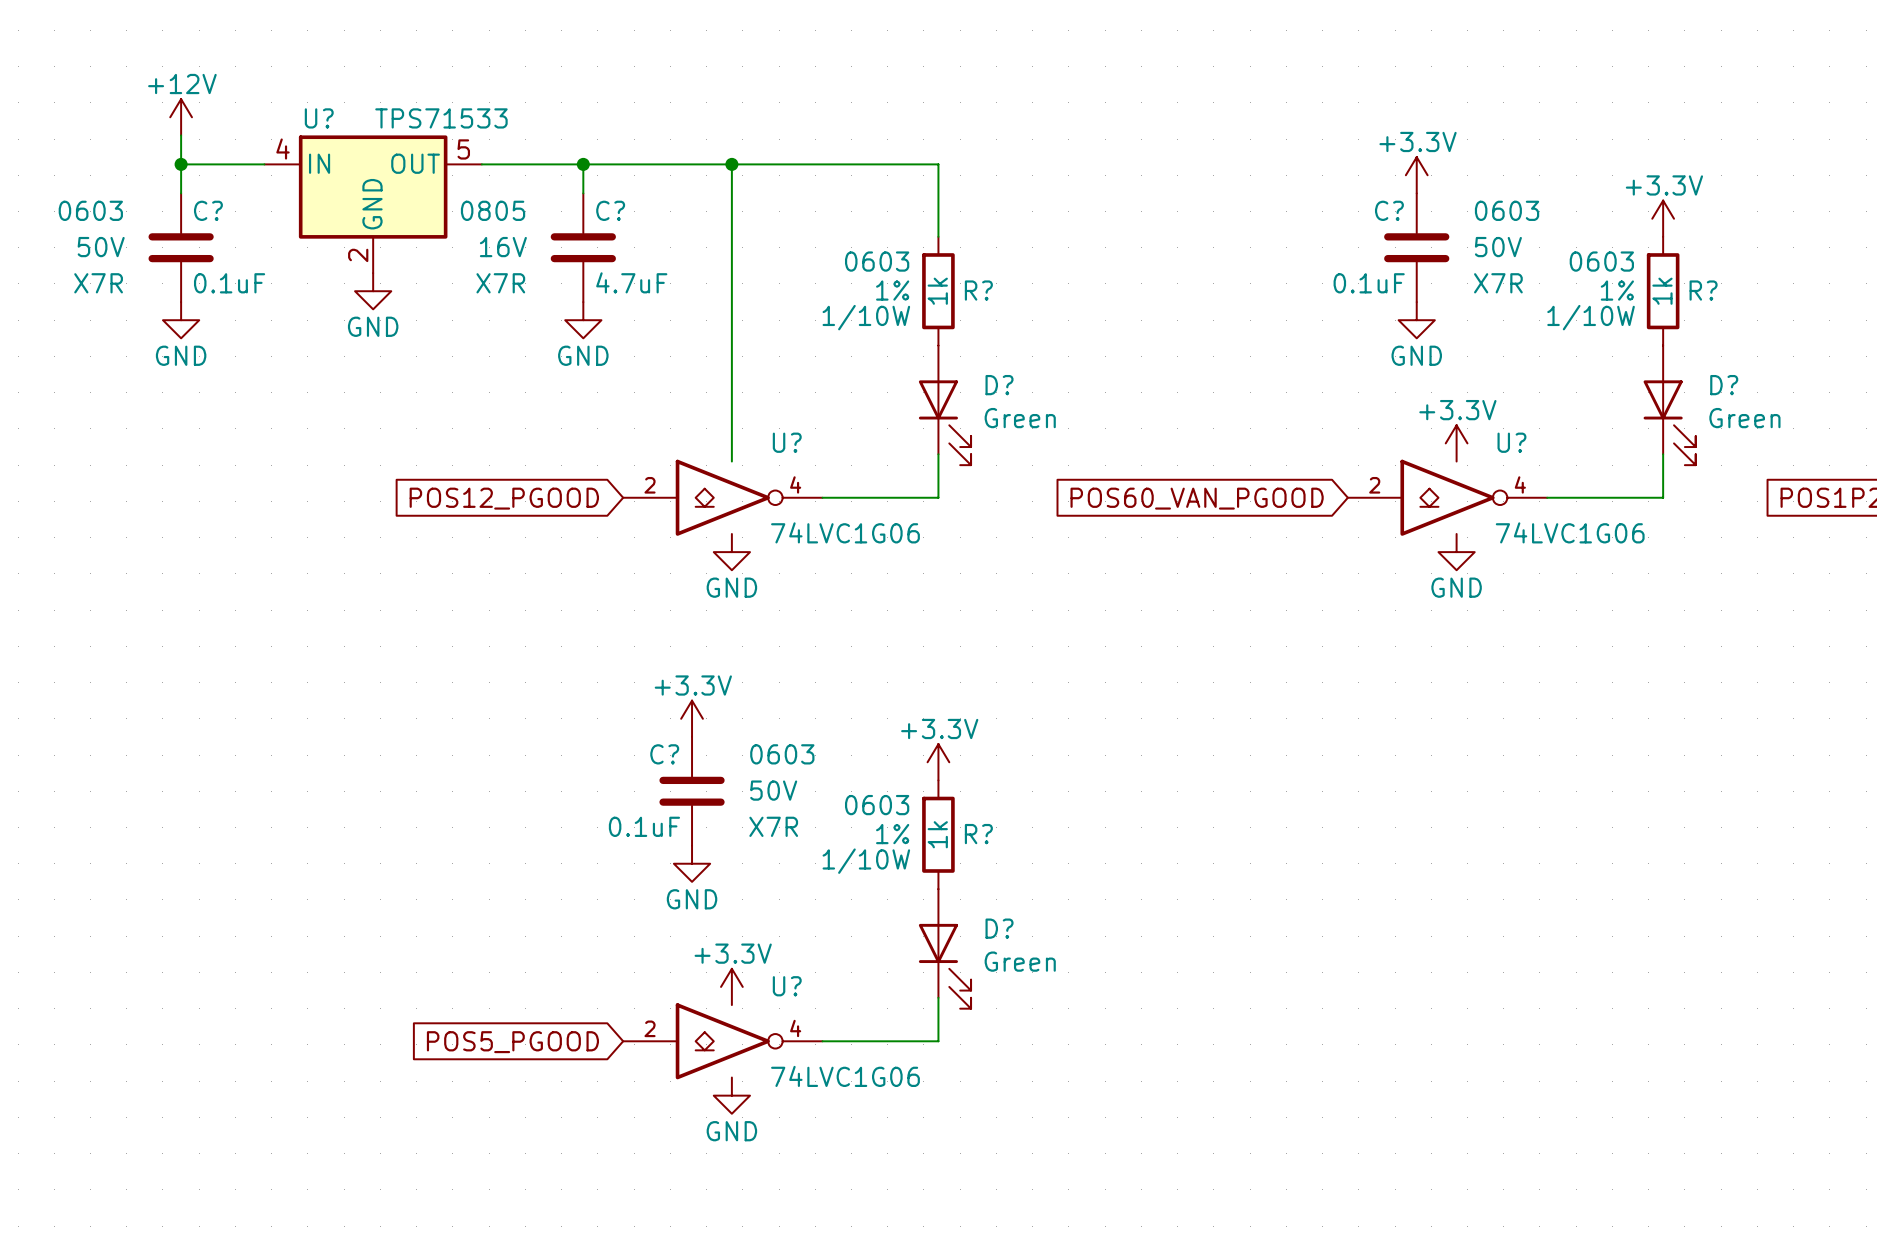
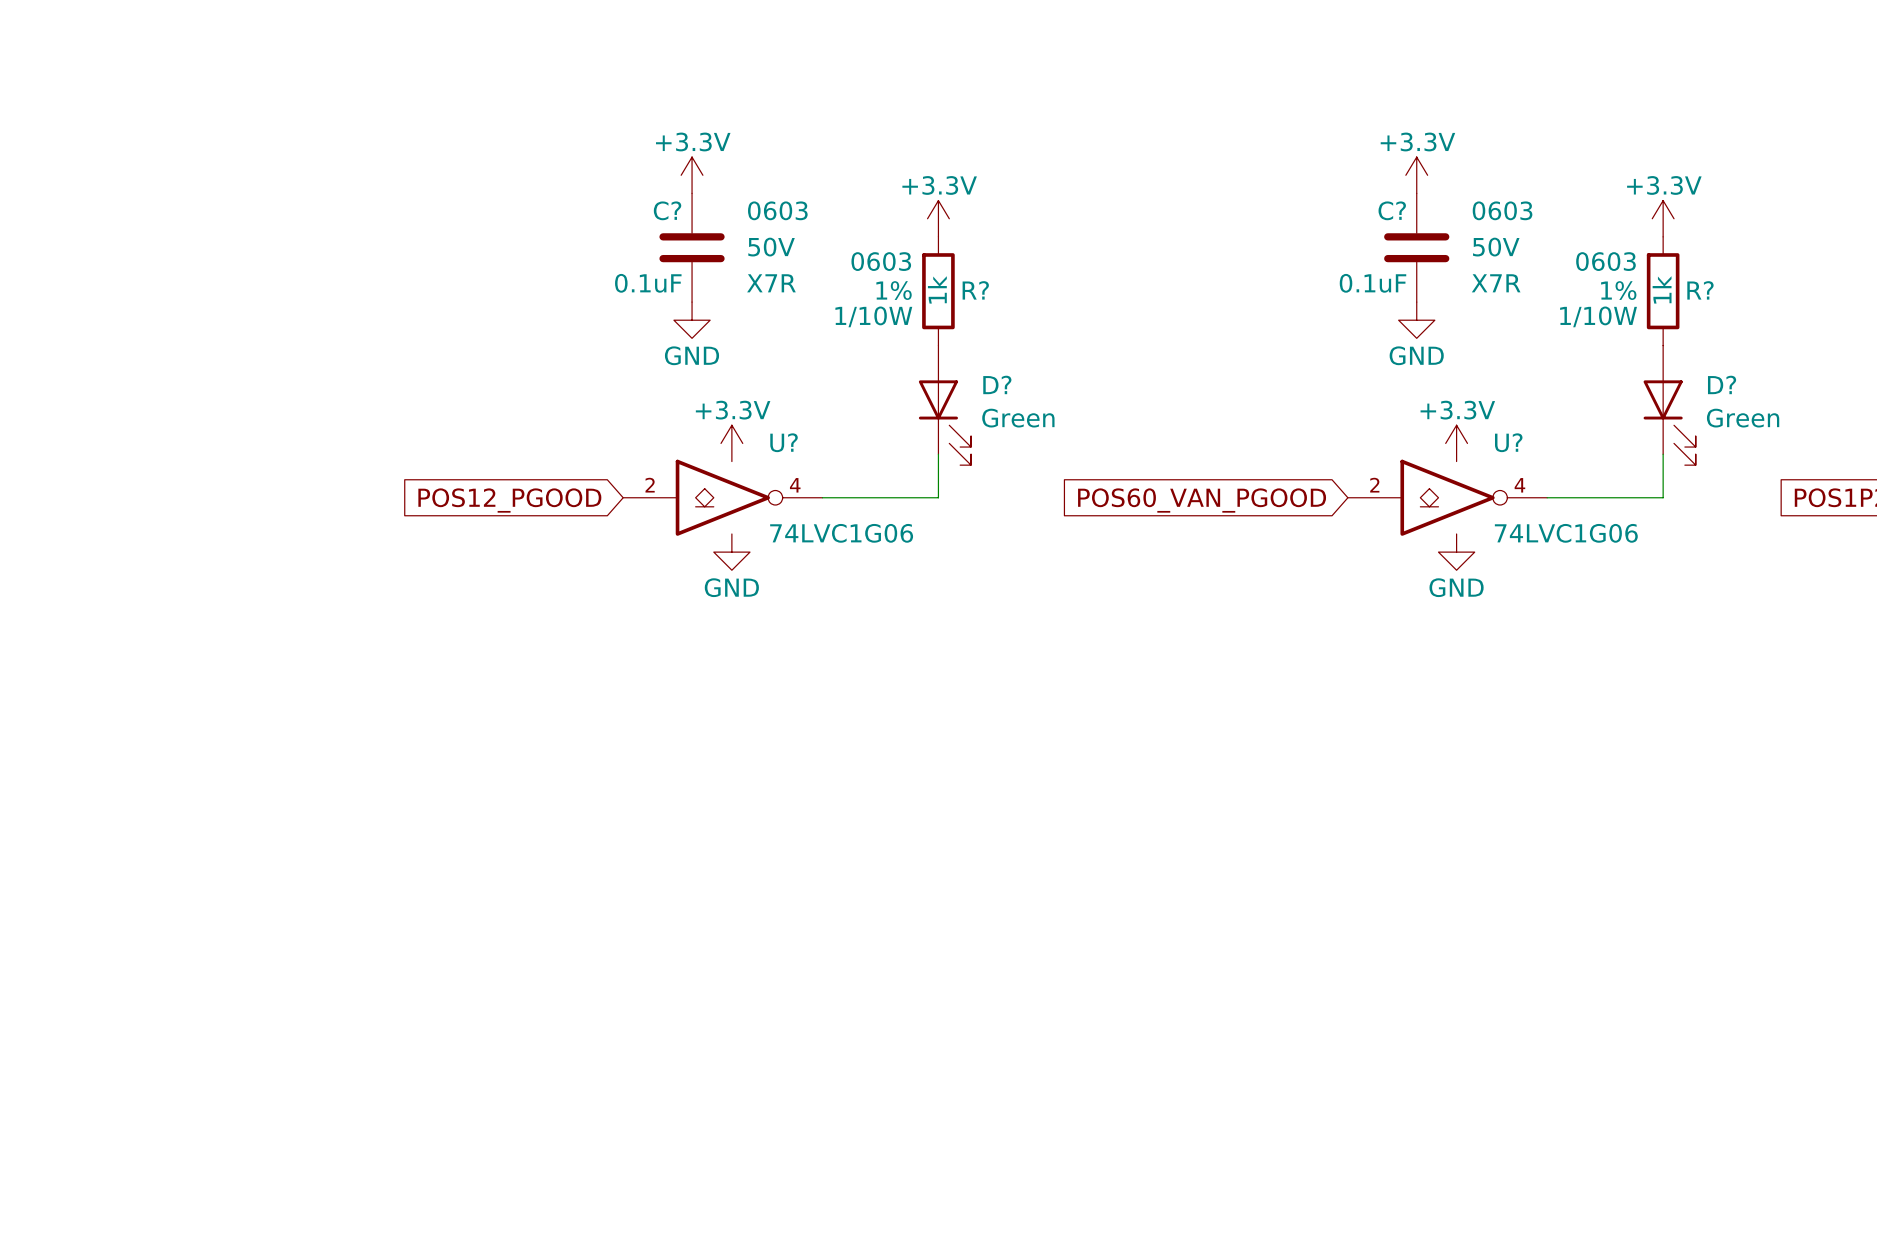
power symbol: +12V (181, 117) -> none
wire: (181, 135) (181, 193) -> none
wire: (181, 164) (264, 164) -> none
junction: (181, 164) -> none
wire: (481, 164) (938, 164) (938, 236) -> none
wire: (583, 164) (583, 193) -> none
junction: (583, 164) -> none
wire: (731, 164) (731, 461) -> none
junction: (731, 164) -> none
power symbol: none -> +3.3V (692, 175)
U?: TPS71533 (373, 204) -> none
power symbol: none -> +3.3V (938, 218)
C?: 0.1uF (181, 247) -> none
C?: 4.7uF (583, 247) -> none
C?: none -> 0.1uF (692, 247)
power symbol: GND (373, 291) -> none
power symbol: GND (181, 320) -> none
power symbol position: GND (583, 320) -> GND (692, 320)
power symbol: none -> +3.3V (731, 443)
power symbol: +3.3V (692, 718) -> none
power symbol: +3.3V (938, 762) -> none
C?: 0.1uF (692, 791) -> none
R?: 1k (938, 834) -> none
power symbol: GND (692, 863) -> none
D?: Green (944, 948) -> none
power symbol: +3.3V (731, 986) -> none
wire: (938, 997) (938, 1041) (822, 1041) -> none
U?: 74LVC1G06 (722, 1041) -> none
global label: POS5_PGOOD (512, 1042) -> none
power symbol: GND (731, 1095) -> none

